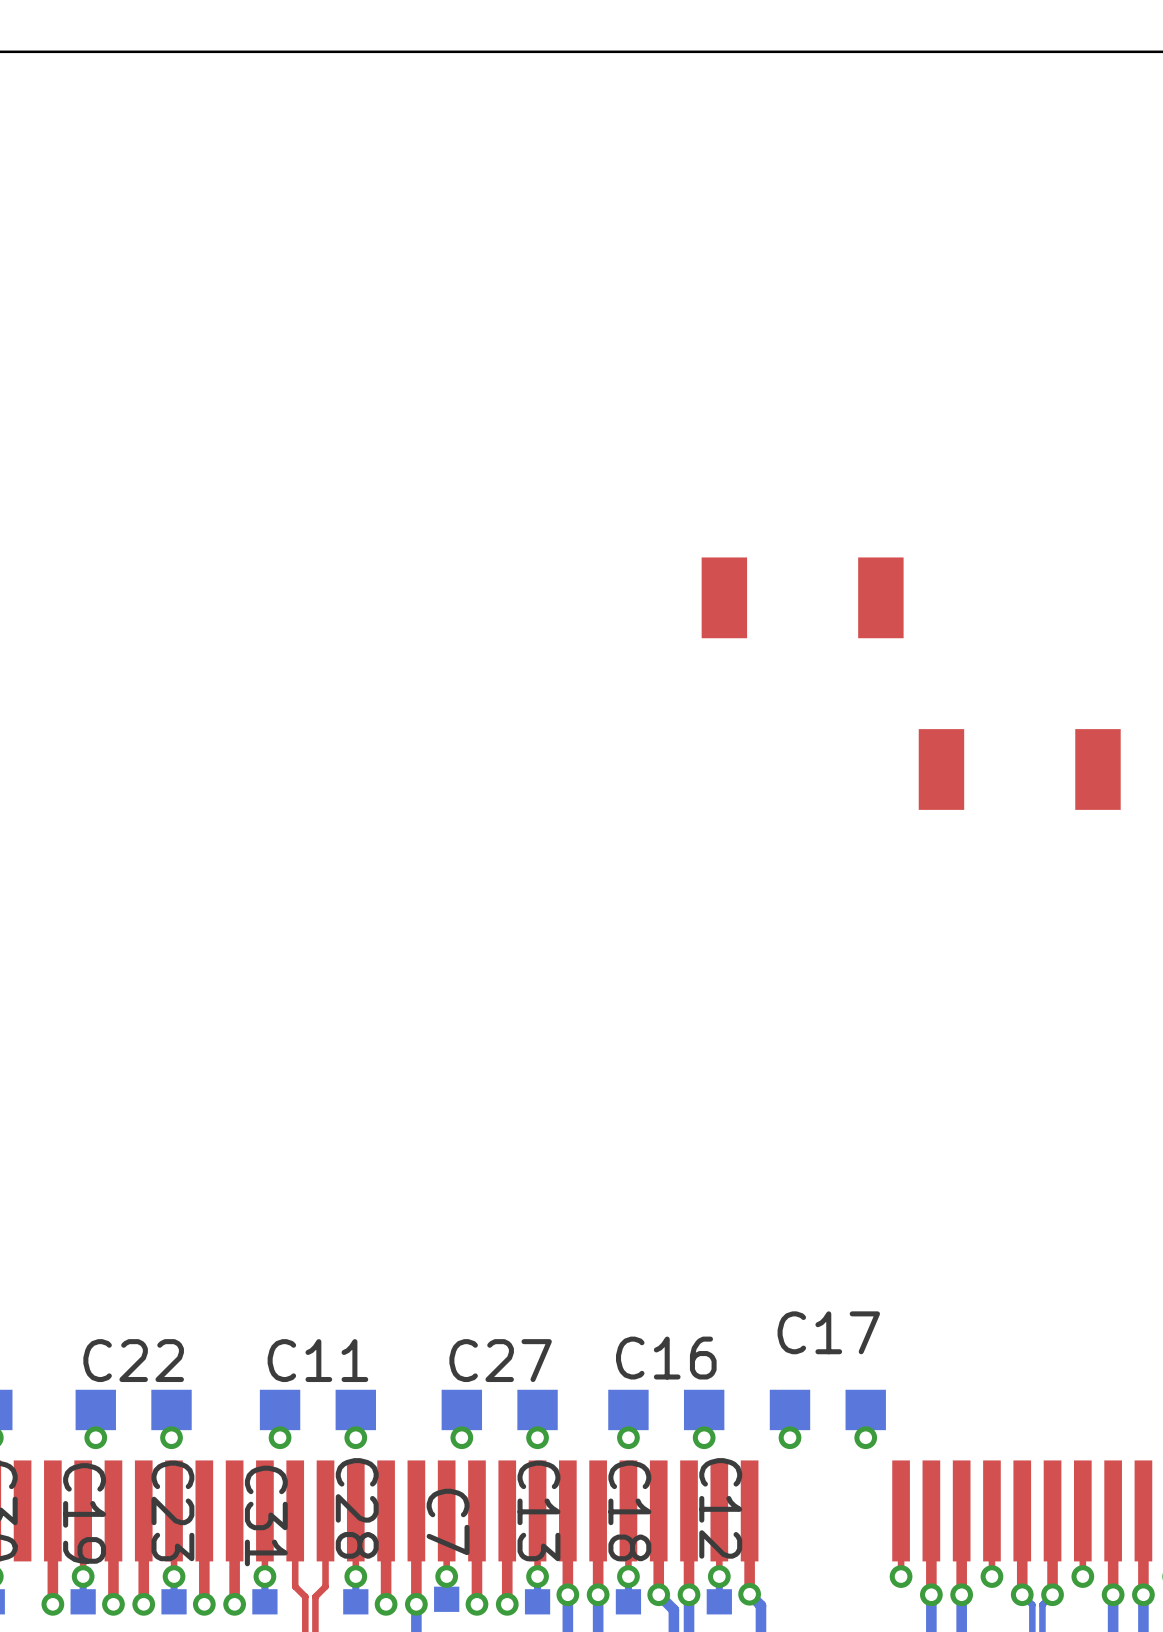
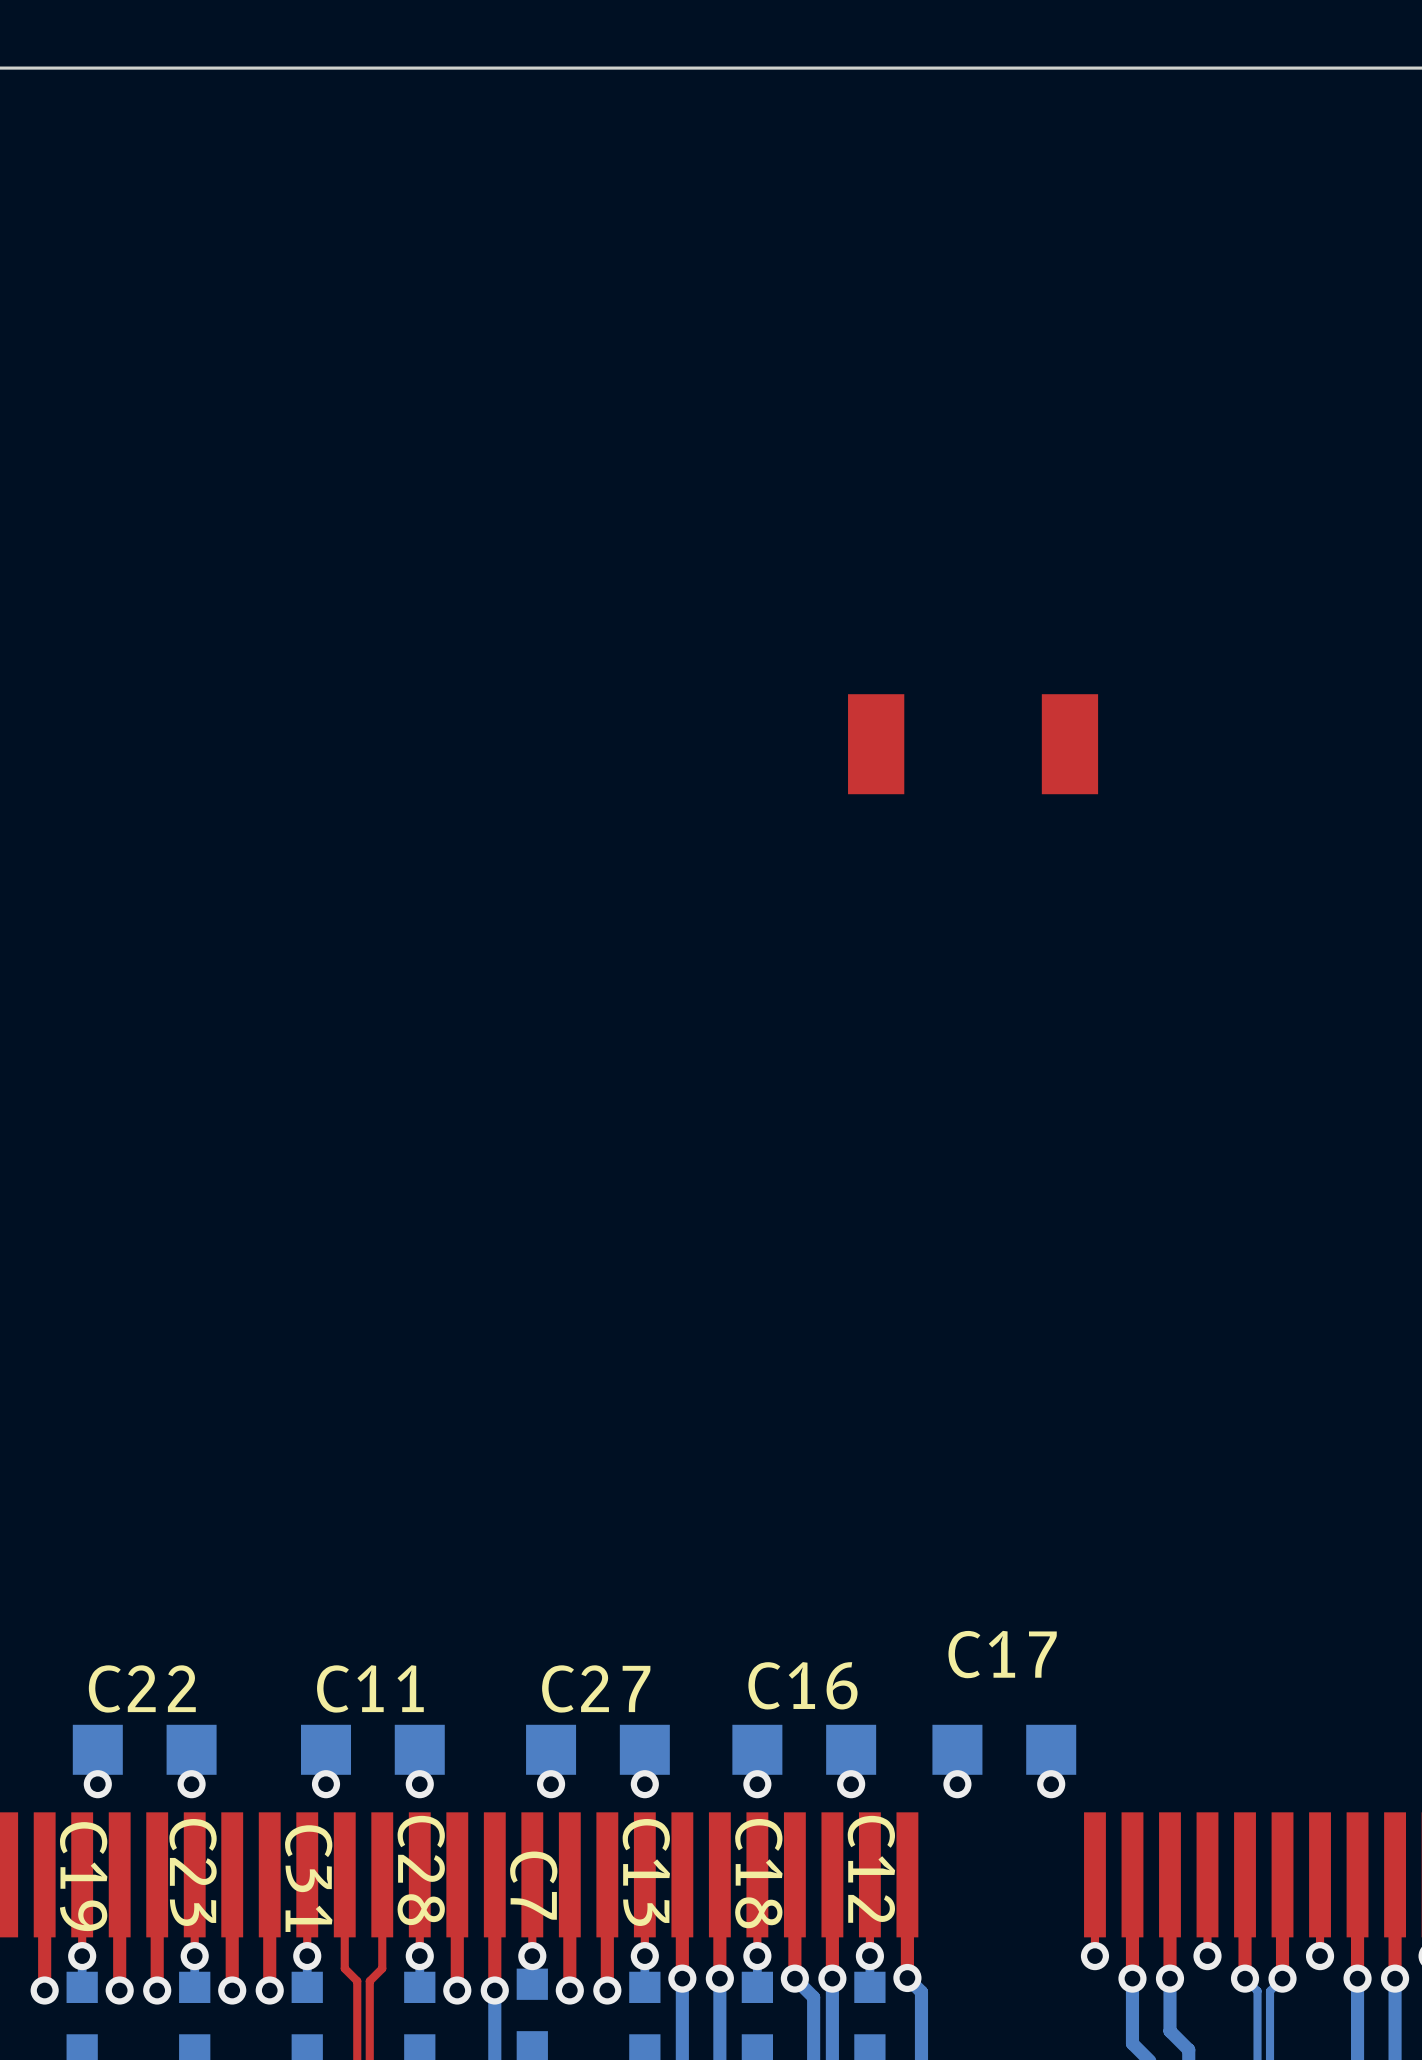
part: (1019, 769) -> none

